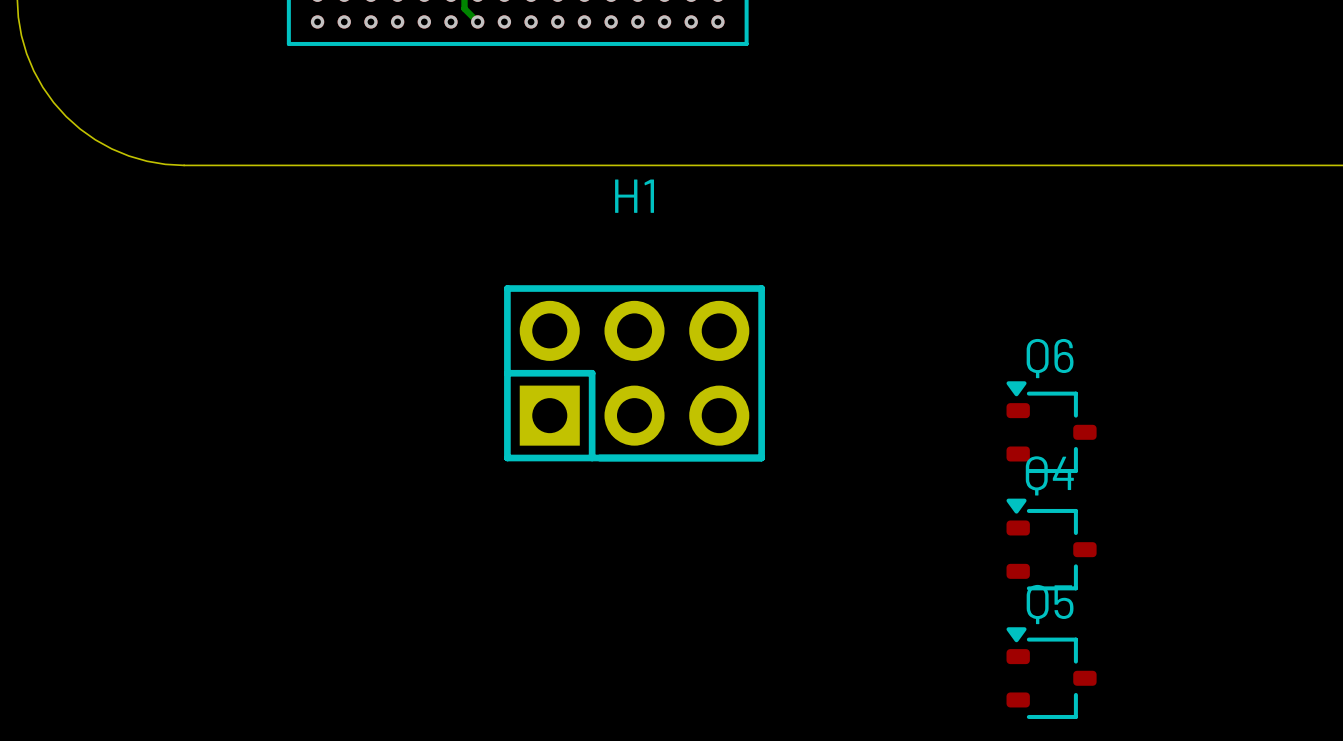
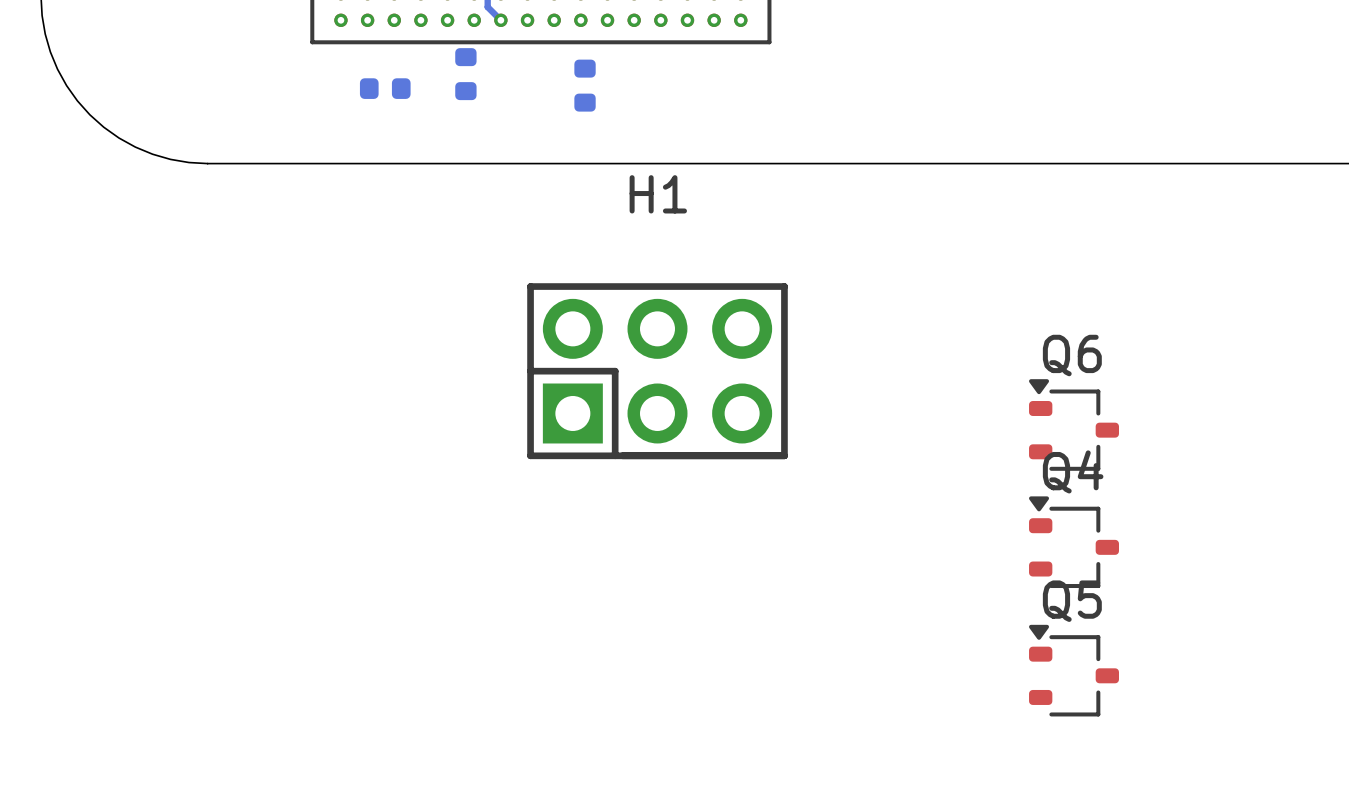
part: none -> (465, 74)
part: none -> (585, 85)
part: none -> (385, 88)

